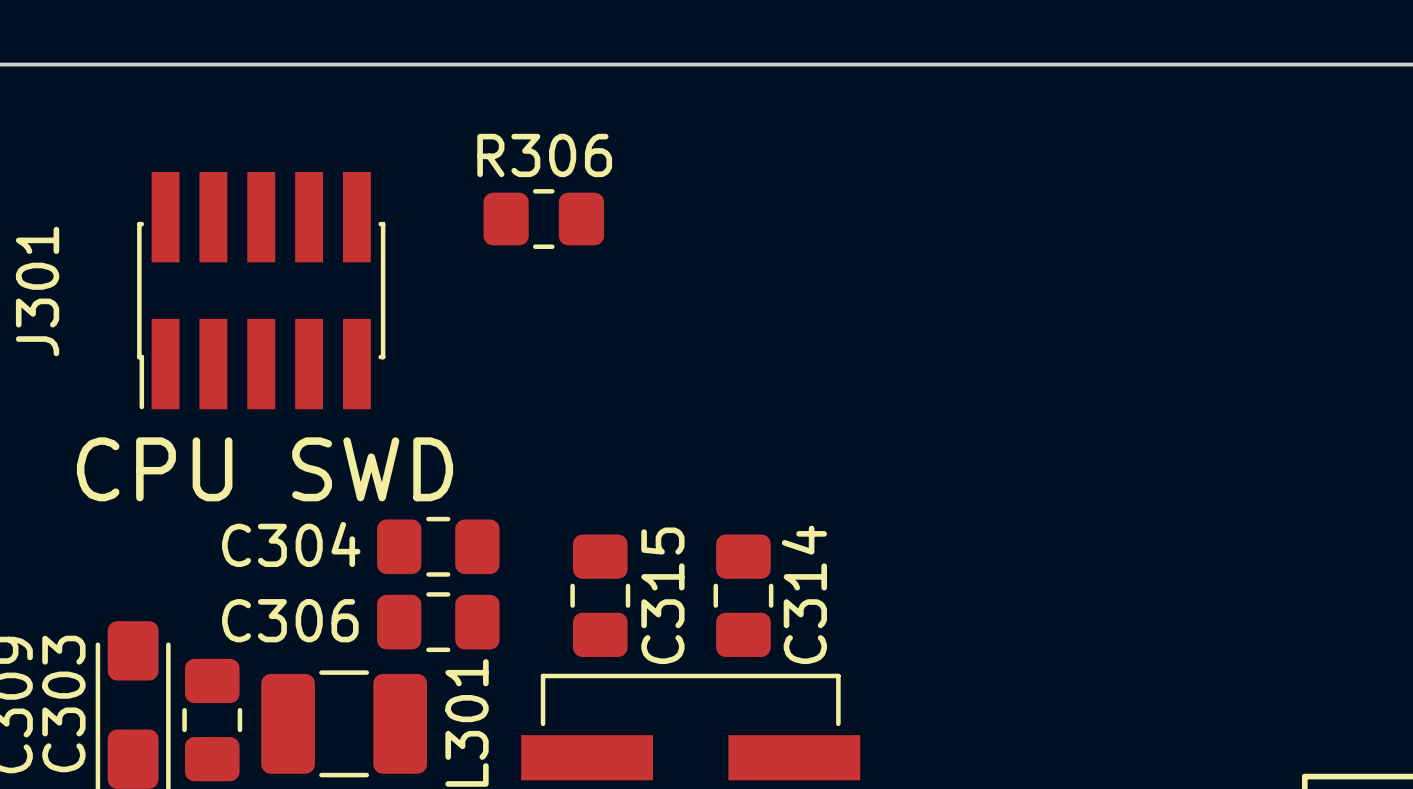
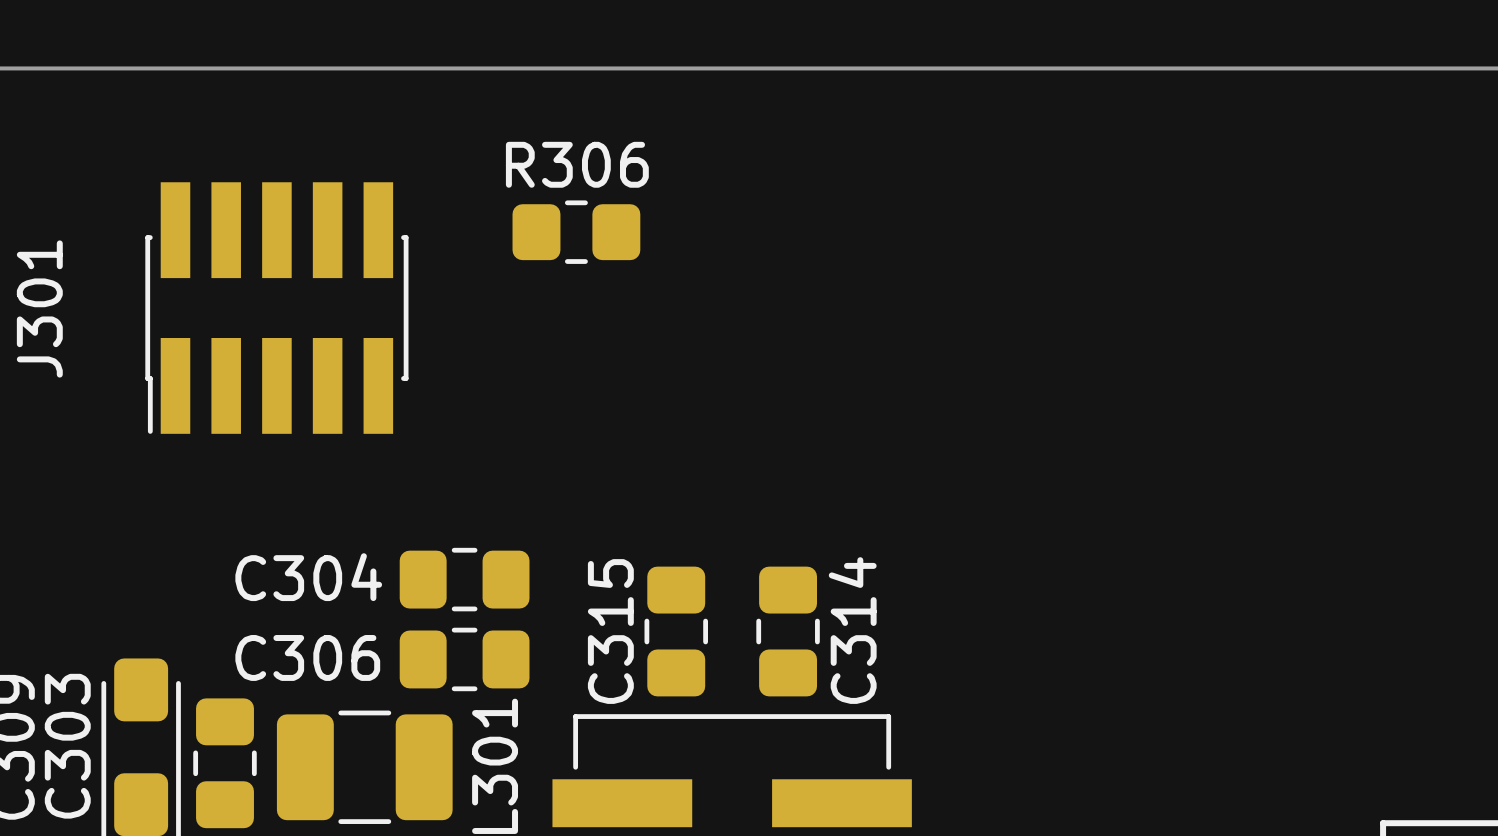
text: CPU SWD (265, 469) -> none
C315 position: (600, 595) -> (676, 631)
C315 name position: C315 (662, 595) -> C315 (610, 631)

